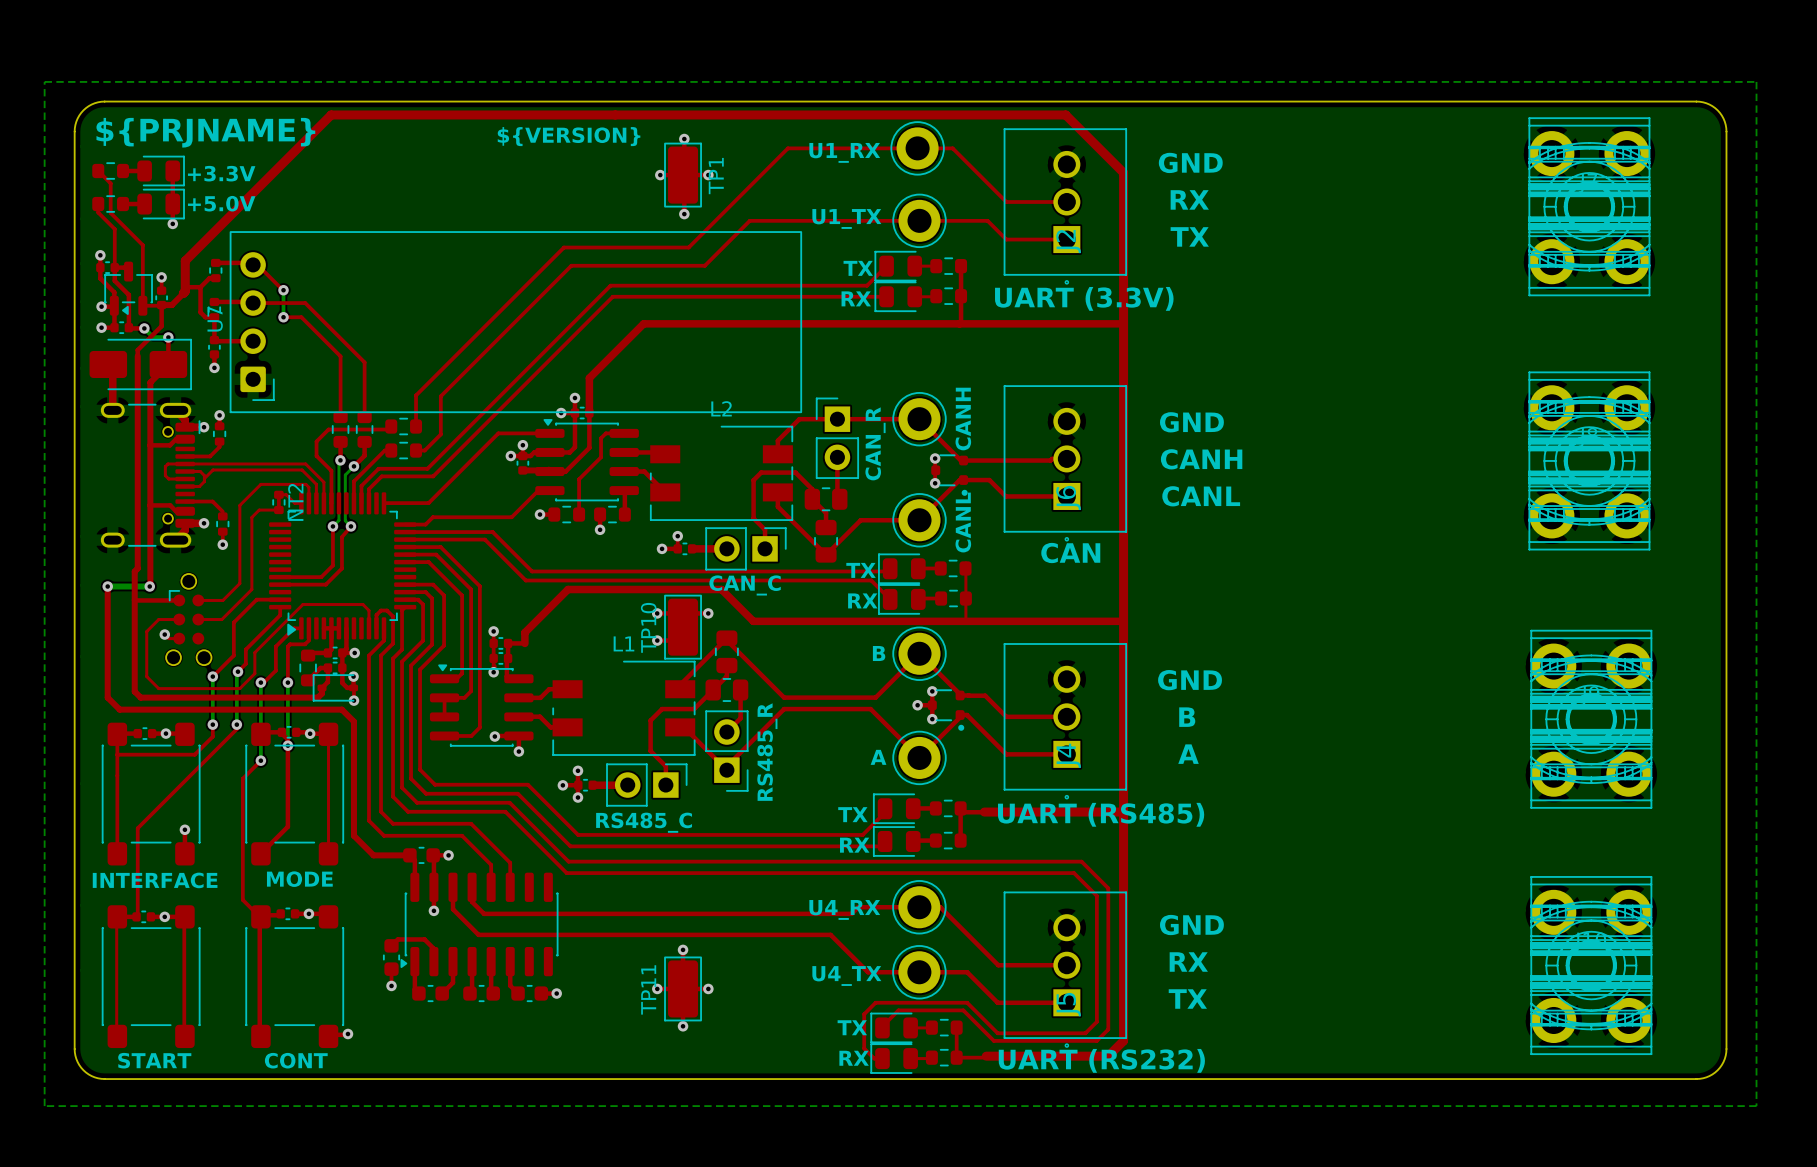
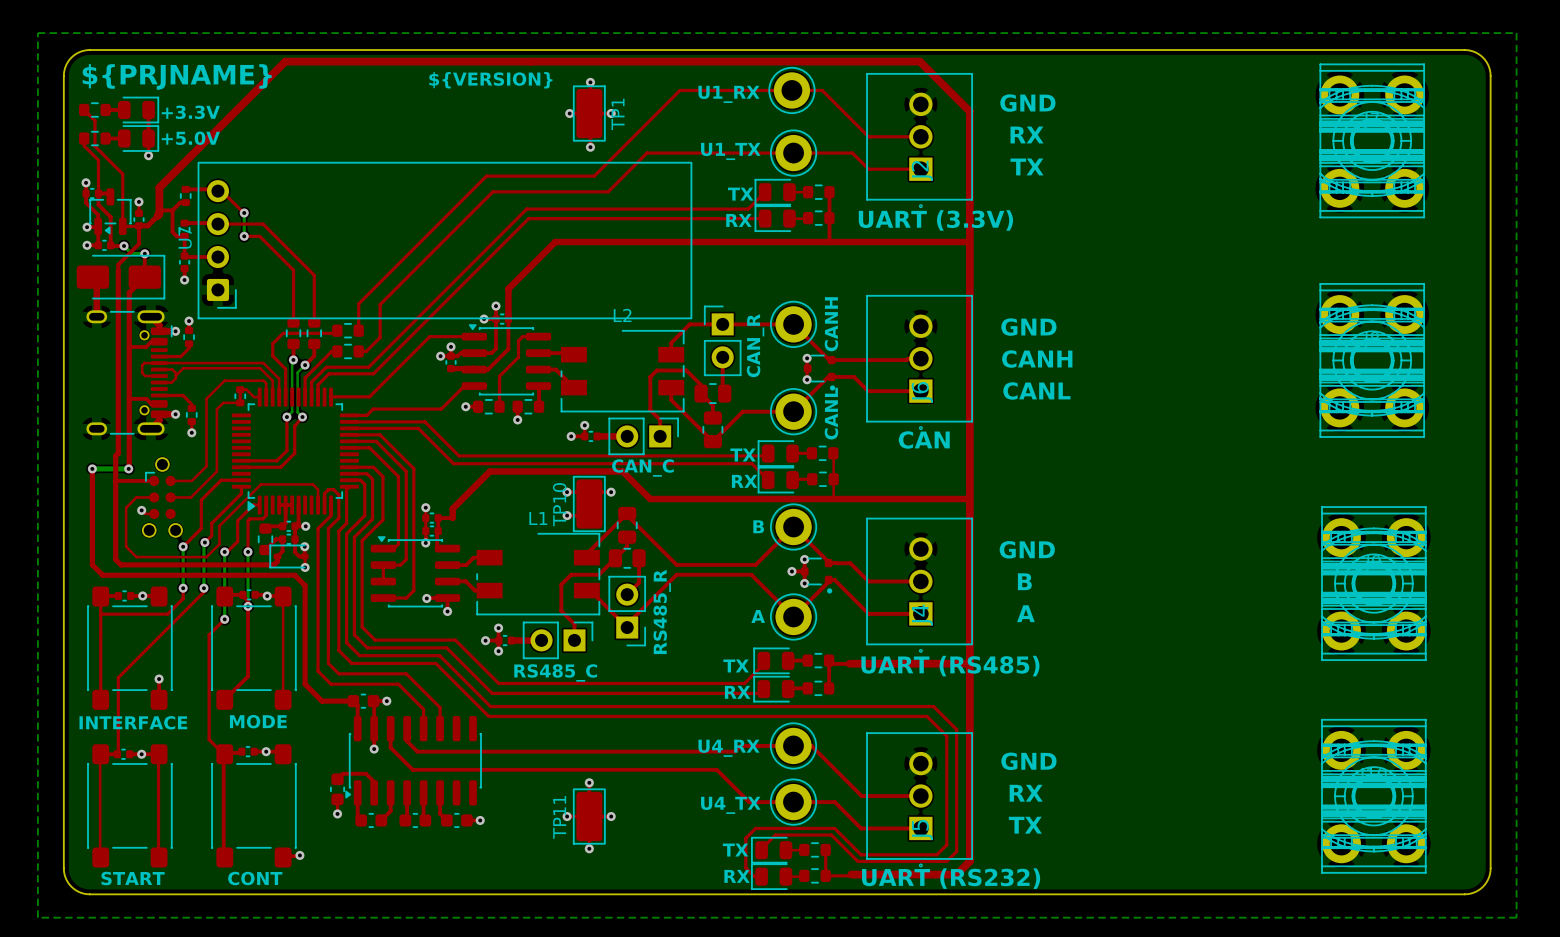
NT2 name: NT2 (295, 502) -> none

